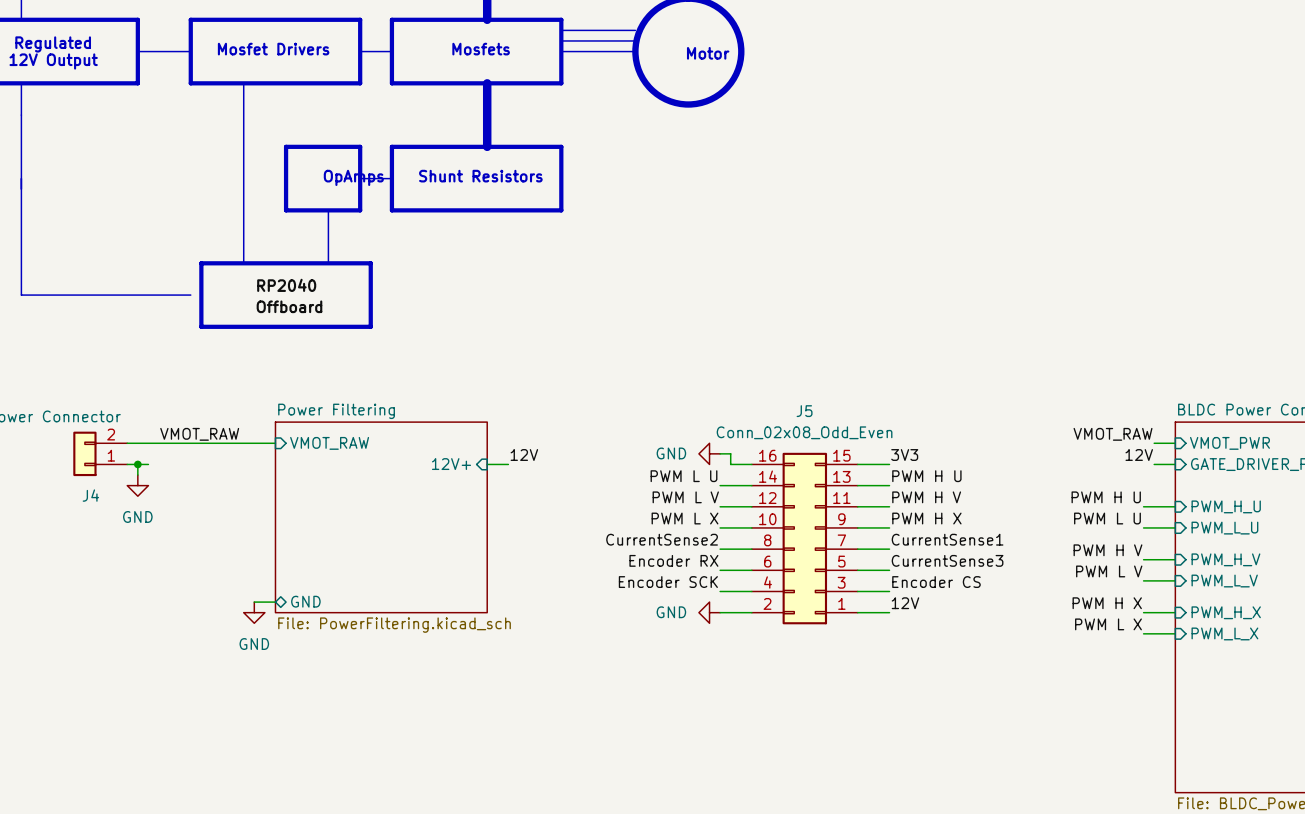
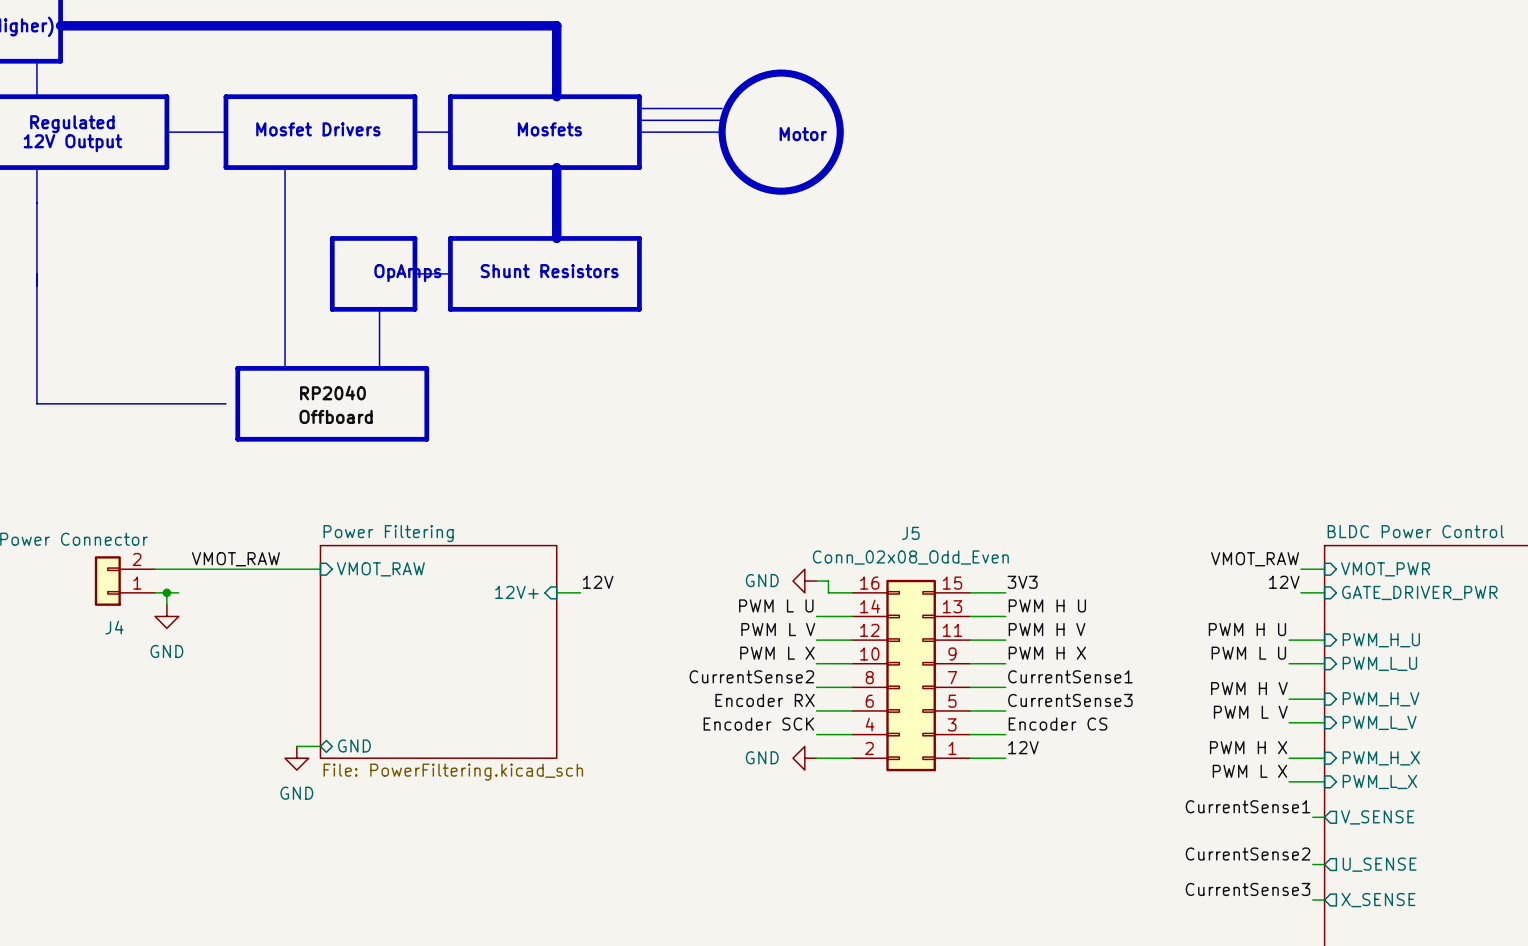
label: none -> CurrentSense1 (1248, 806)
wire: none -> (1312, 817) (1324, 817)
sheet pin: none -> V_SENSE (1377, 817)
label: none -> CurrentSense2 (1248, 854)
wire: none -> (1312, 864) (1324, 864)
sheet pin: none -> U_SENSE (1379, 864)
label: none -> CurrentSense3 (1248, 889)
wire: none -> (1312, 899) (1324, 899)
sheet pin: none -> X_SENSE (1378, 900)

